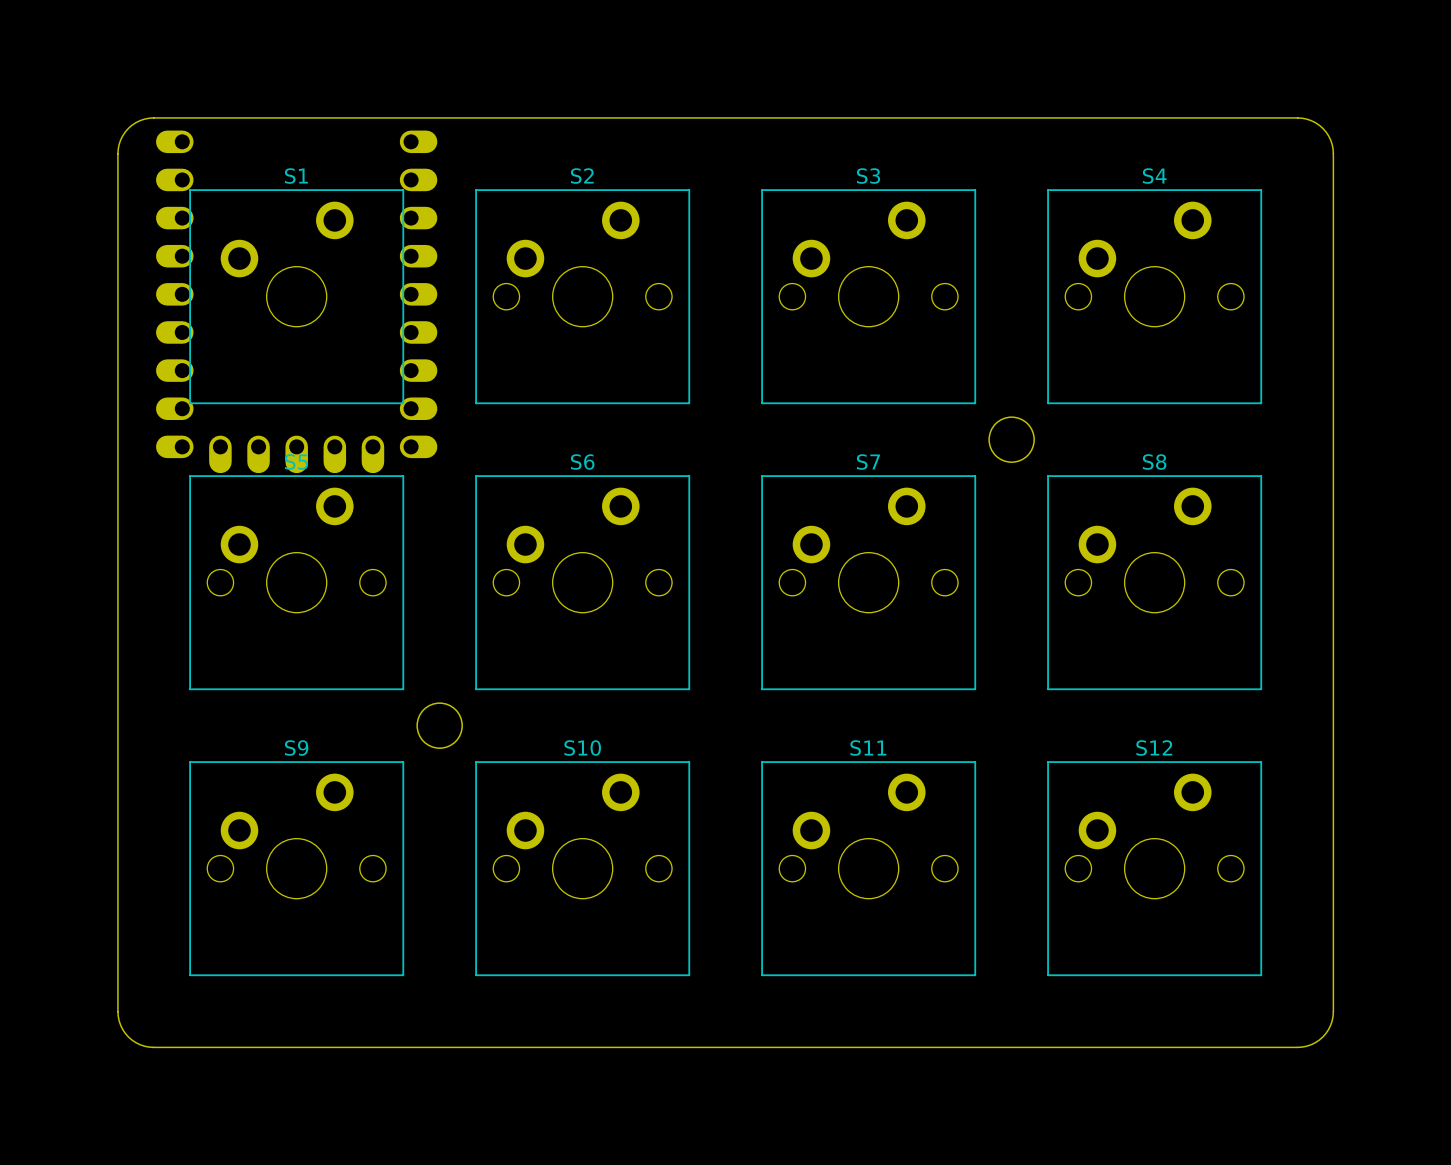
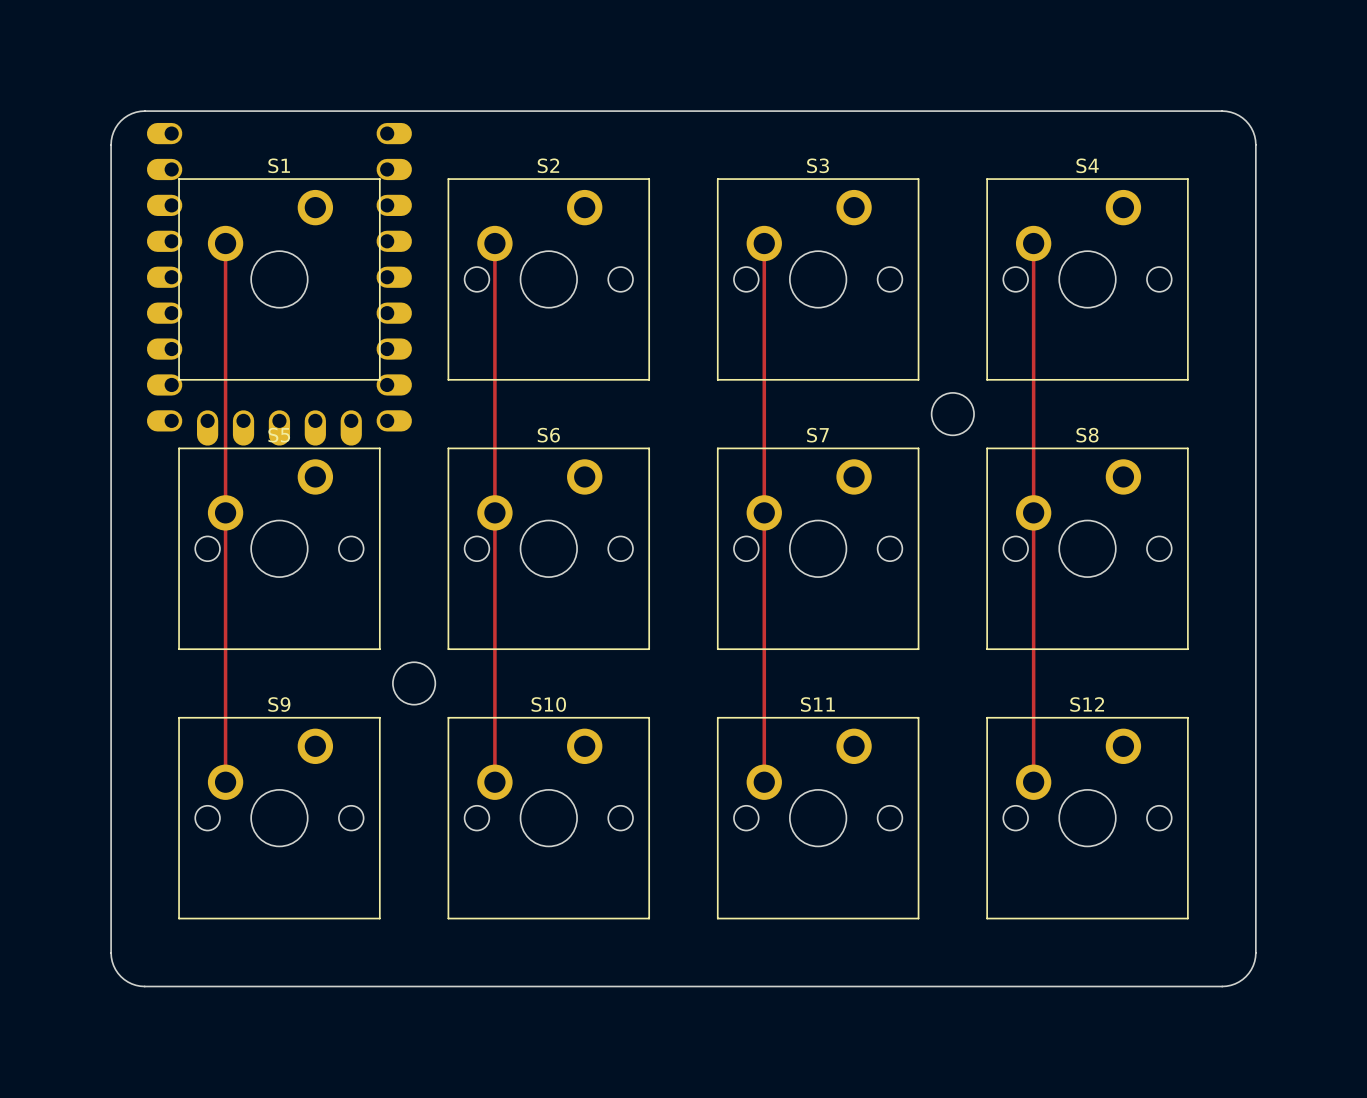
track: none -> (225, 243) (225, 782)
track: none -> (494, 243) (494, 782)
track: none -> (764, 243) (764, 782)
track: none -> (1033, 243) (1033, 782)

